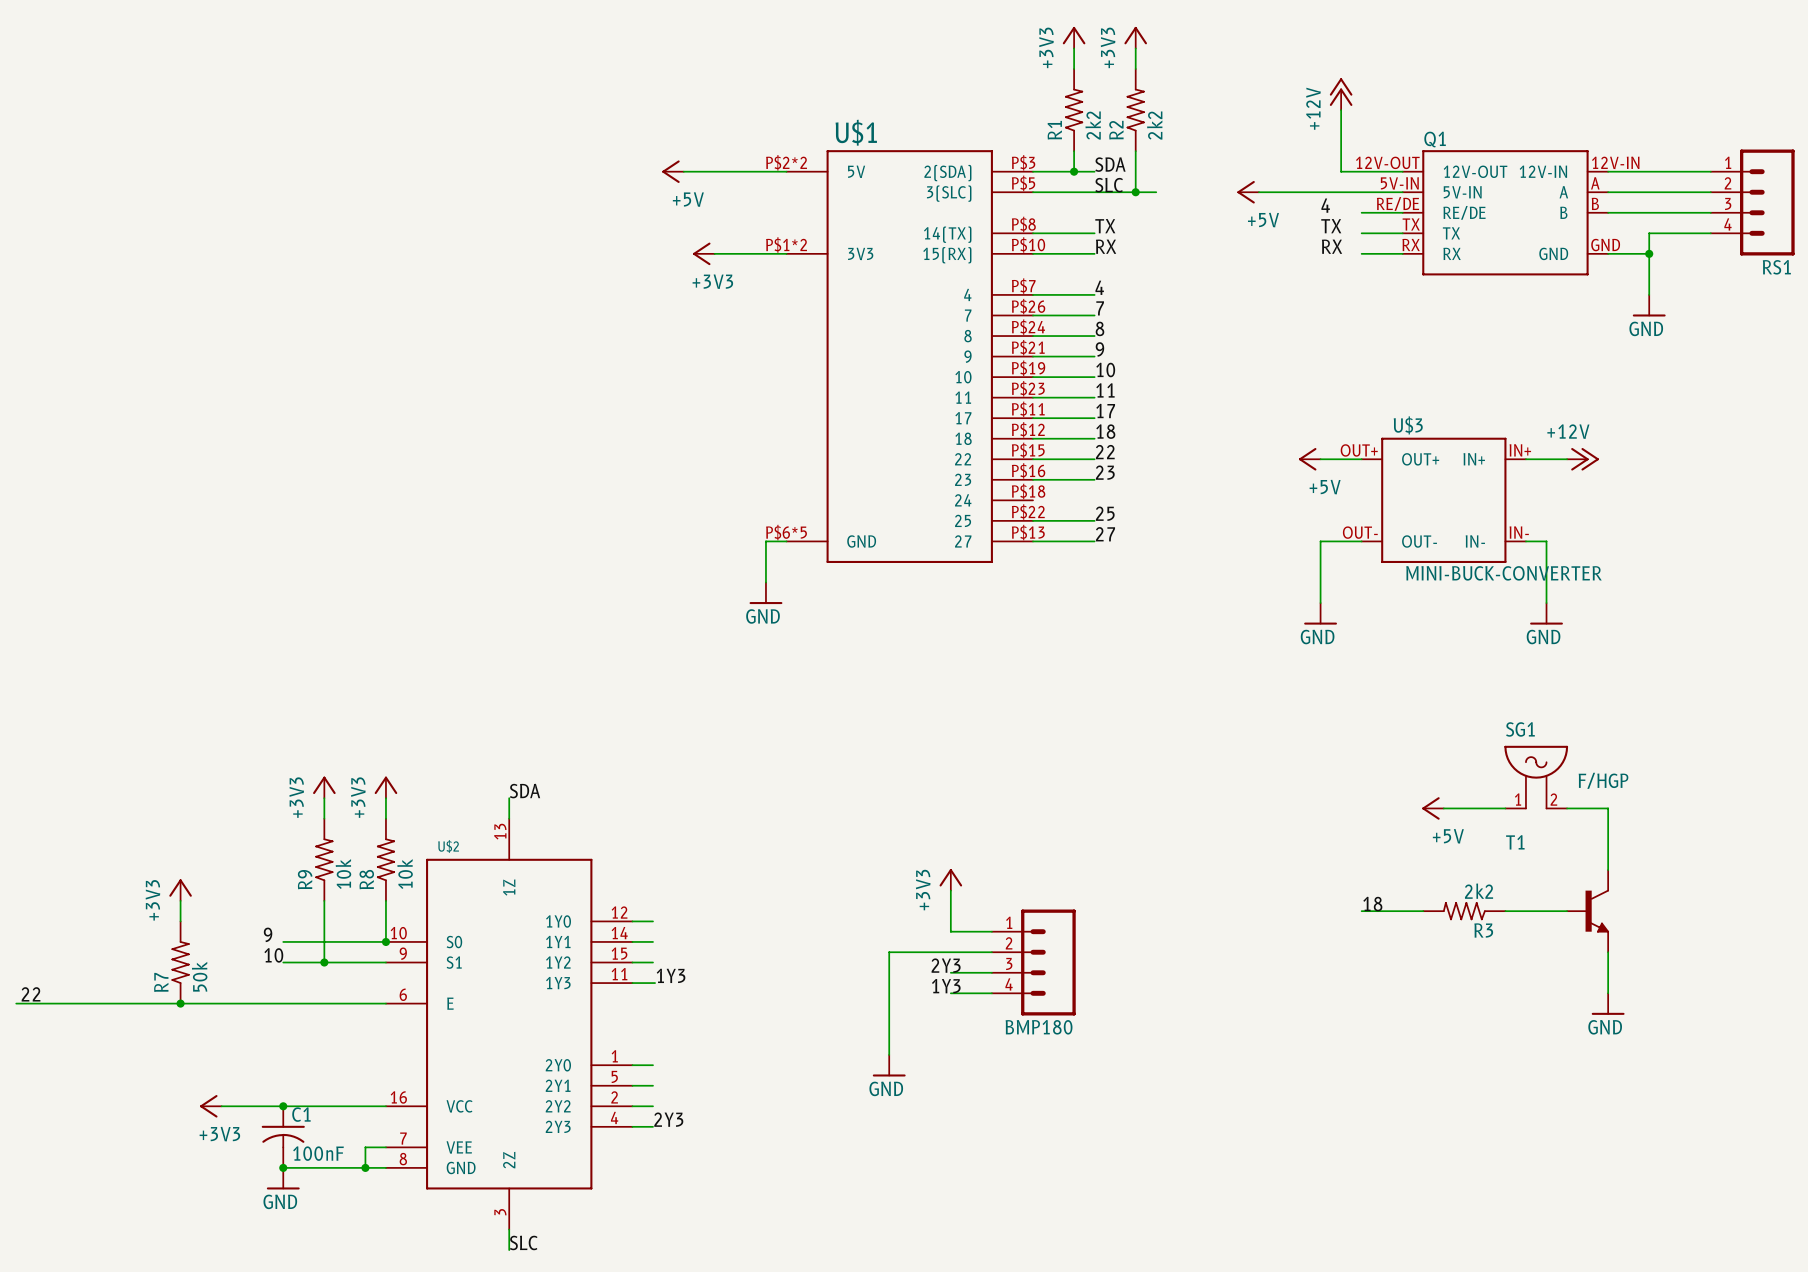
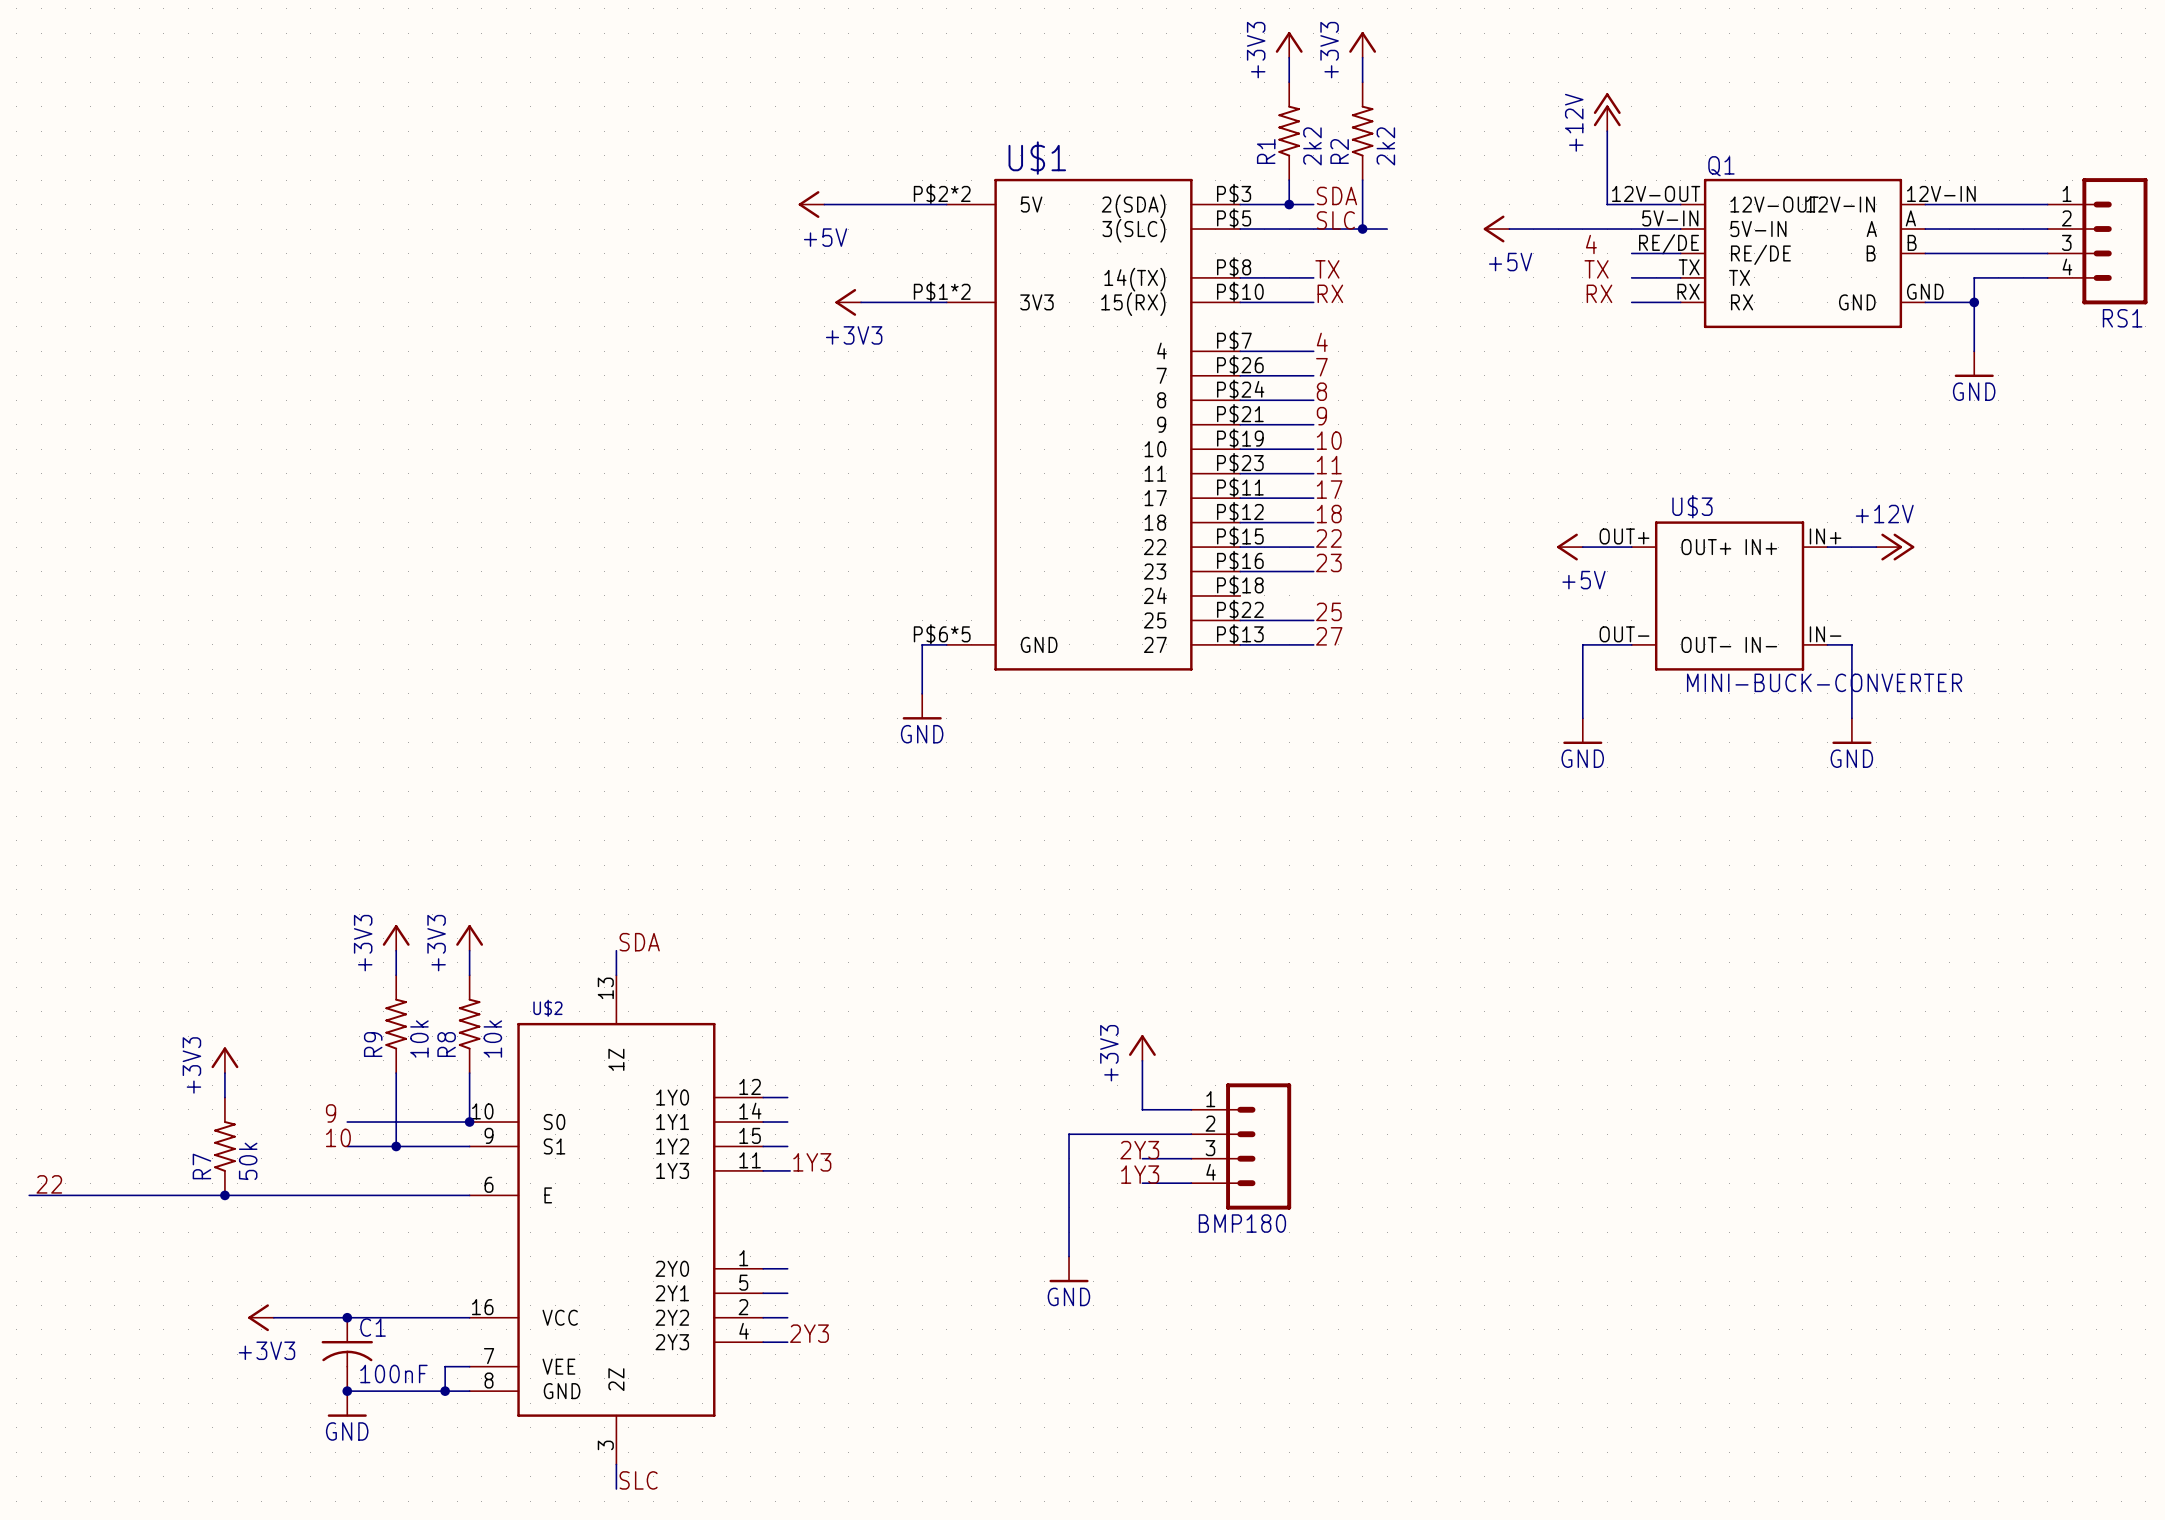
SG1: F/HGP (1536, 777) -> none
power symbol: +5V (1433, 808) -> none
wire: (1443, 808) (1505, 808) -> none
wire: (1567, 808) (1608, 808) (1608, 870) -> none
label: 18 (1372, 904) -> none
wire: (1361, 911) (1423, 911) -> none
R3: 2k2 (1464, 911) -> none
wire: (1505, 911) (1567, 911) -> none
T1: (1587, 911) -> none
wire: (1608, 952) (1608, 993) -> none
power symbol: GND (1608, 1004) -> none

